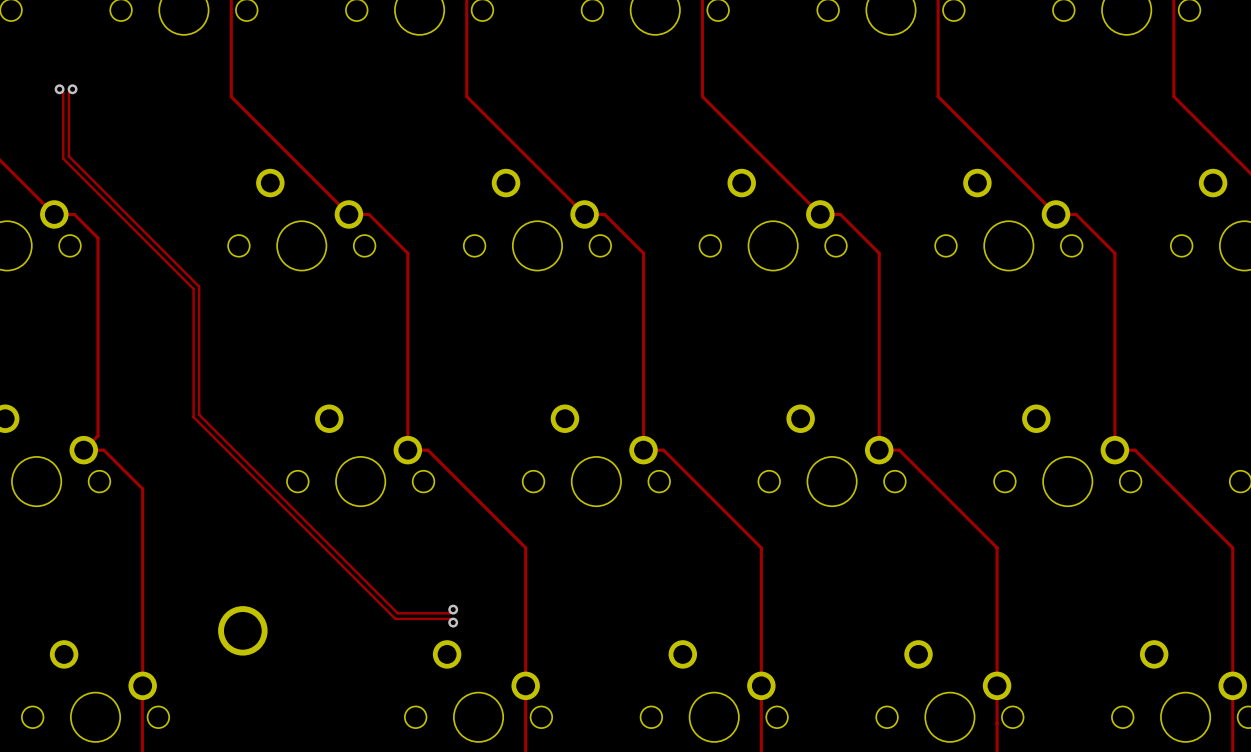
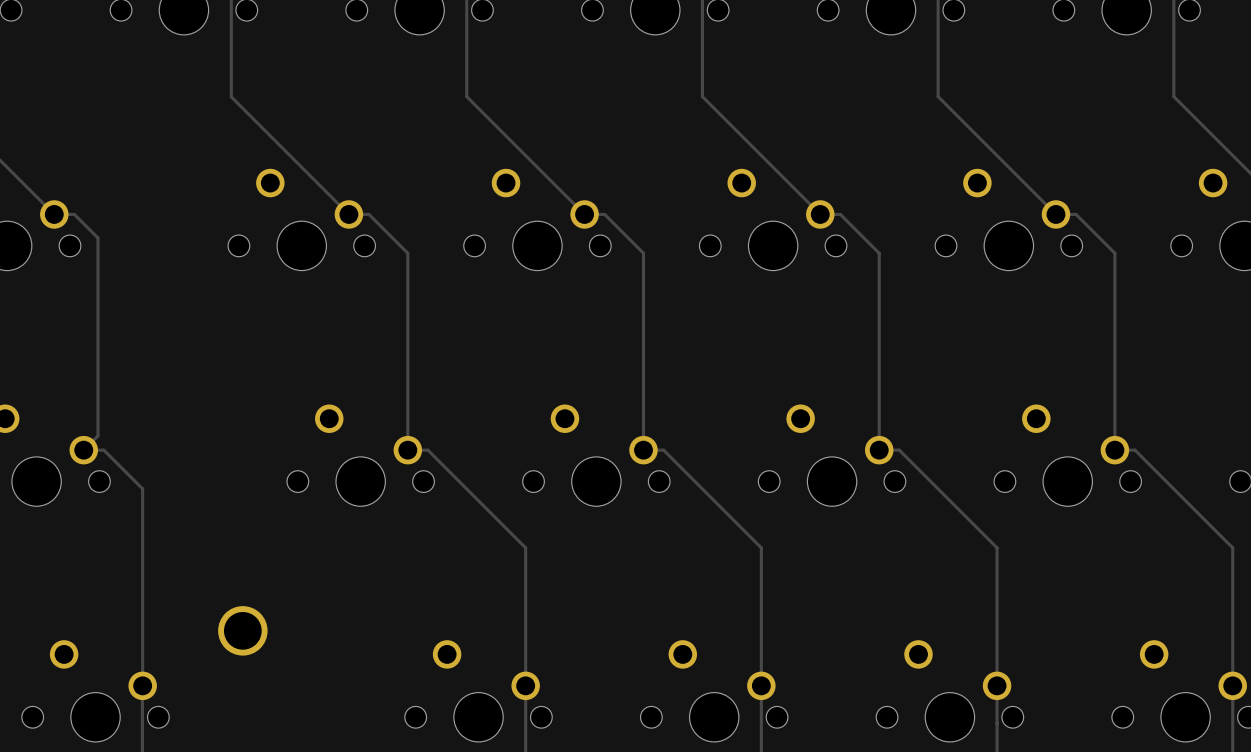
track: (59, 89) (63, 92) (63, 158) (193, 288) (193, 417) (395, 618) (449, 618) (453, 622) -> none
via: (59, 89) -> none
track: (72, 89) (68, 92) (68, 156) (199, 286) (199, 414) (397, 613) (449, 613) (453, 609) -> none
via: (72, 89) -> none
via: (453, 609) -> none
via: (453, 622) -> none

